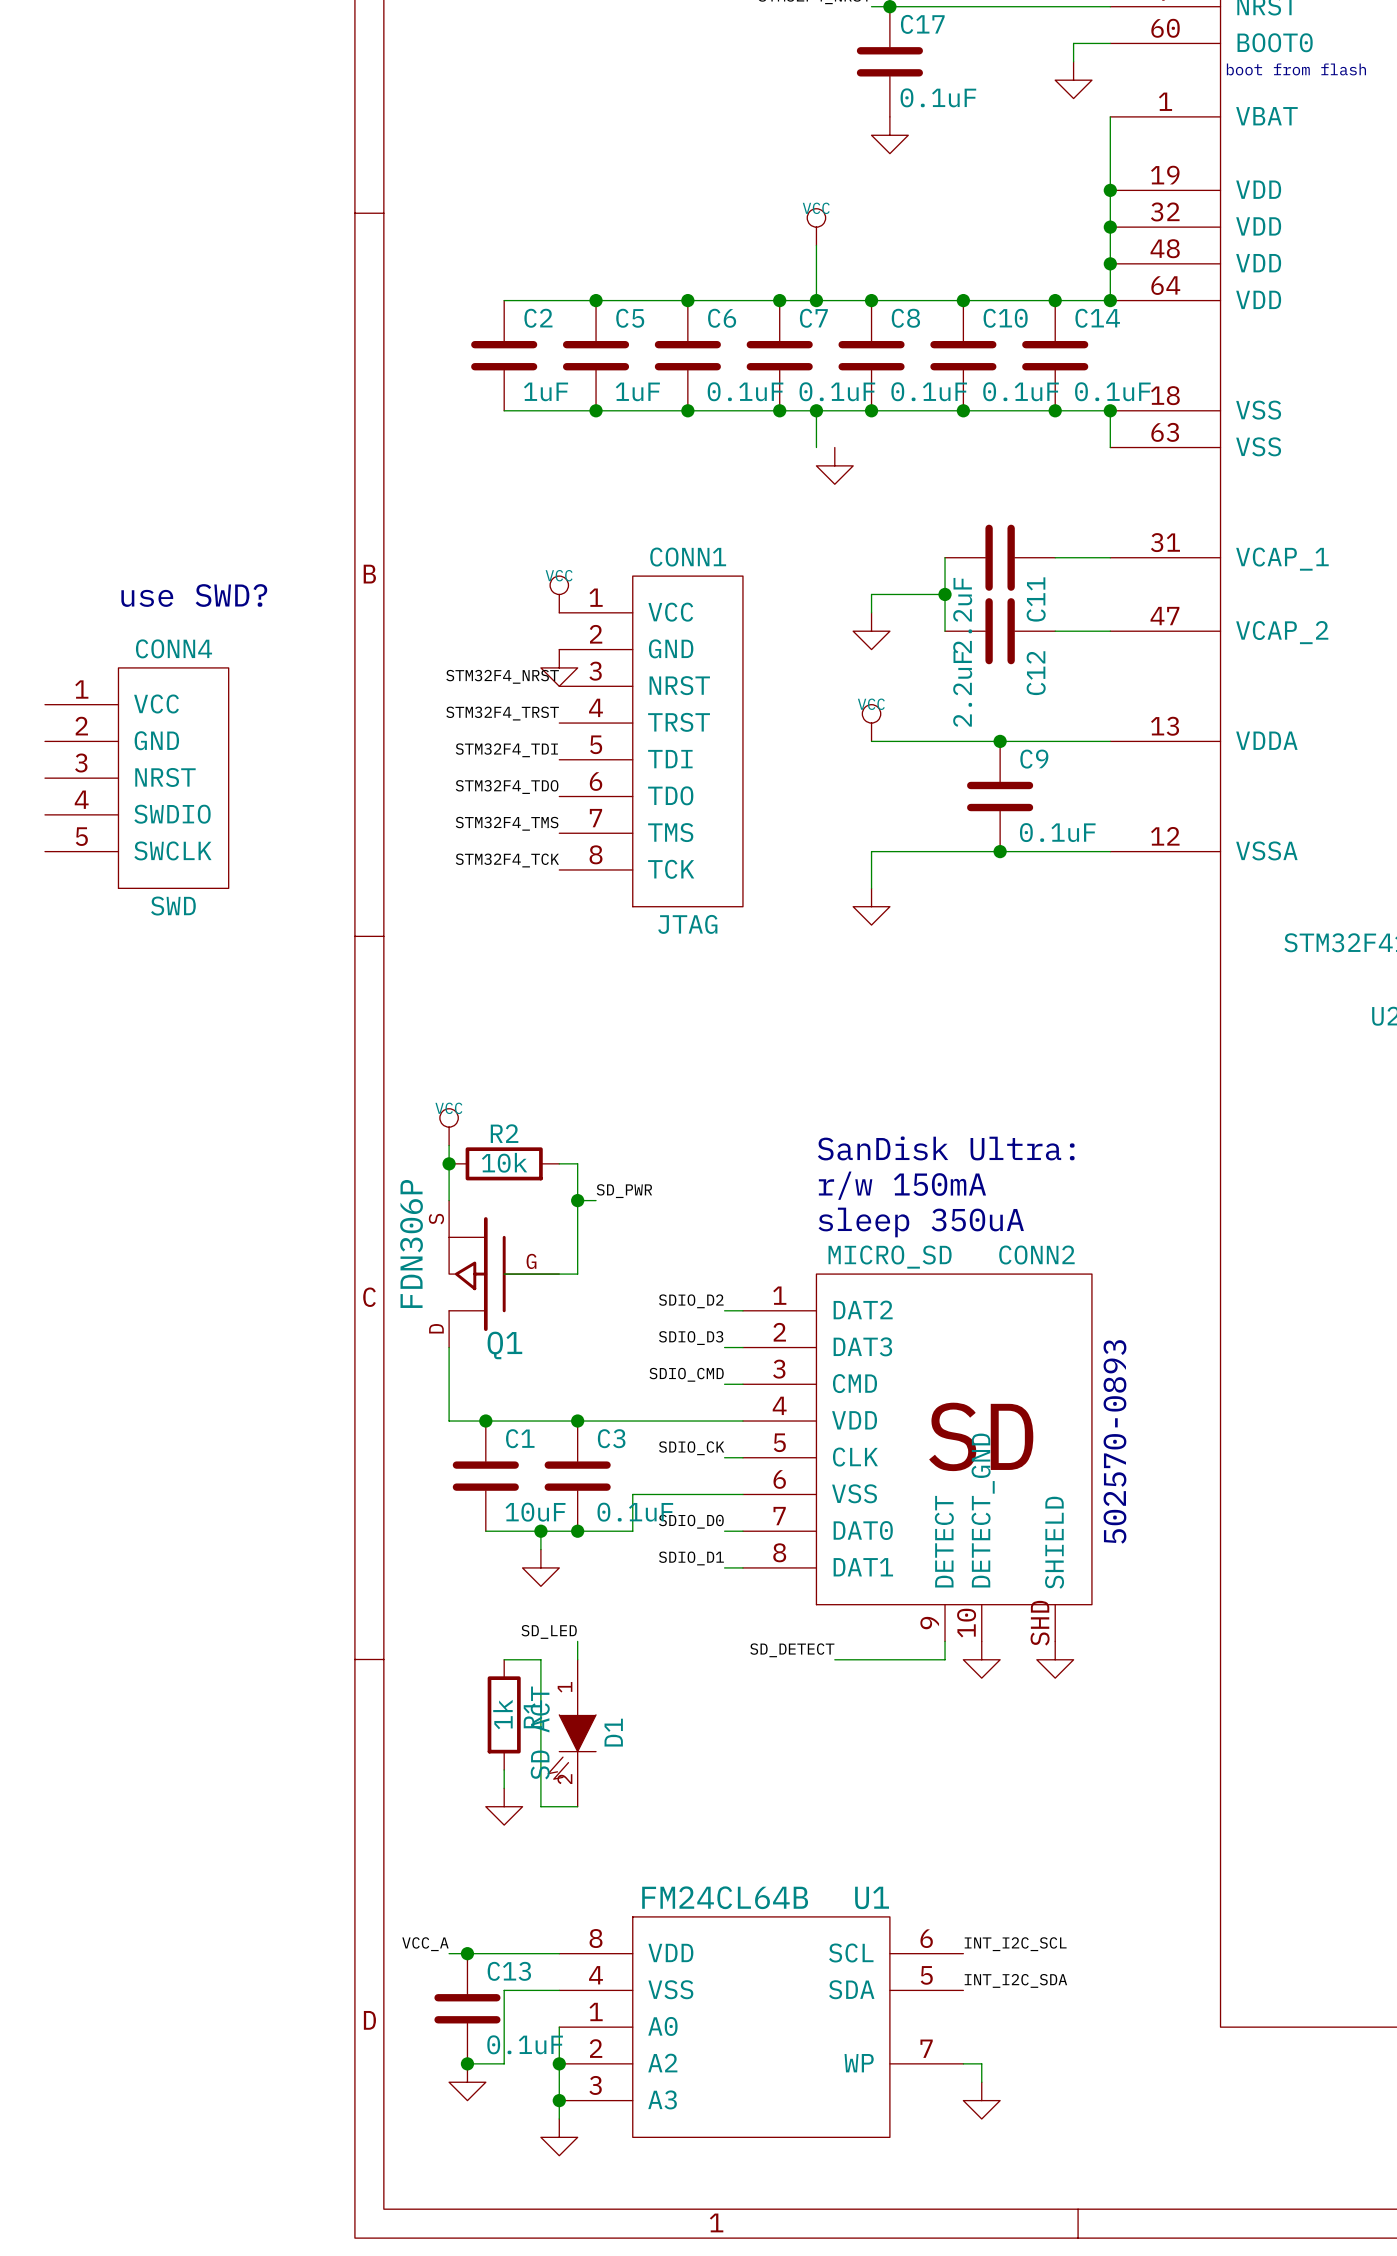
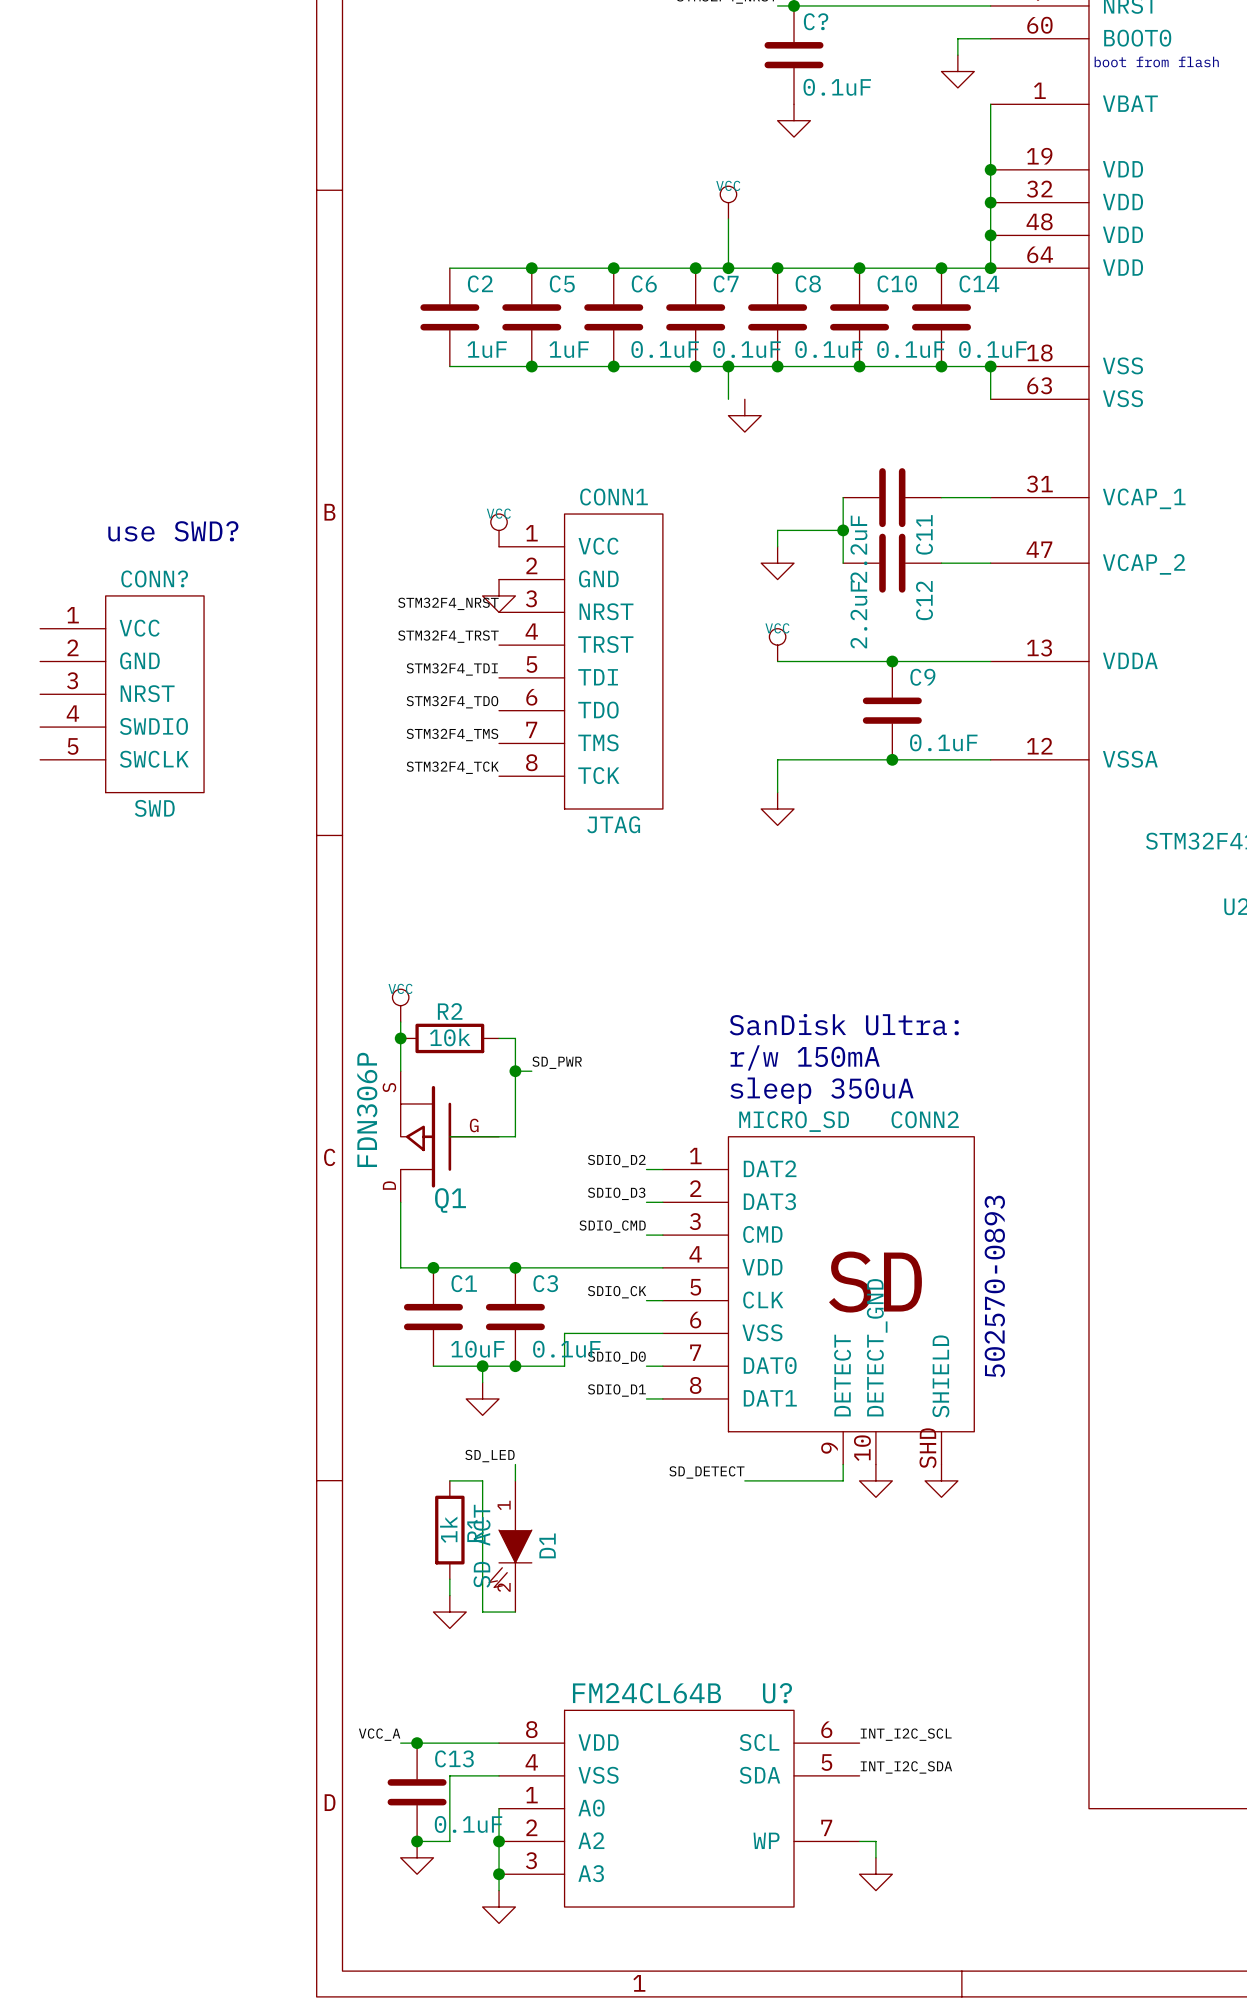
C17 name: C17 (922, 24) -> C? (816, 21)
CONN4 name: CONN4 (173, 648) -> CONN? (154, 578)
U1 name: U1 (872, 1897) -> U? (777, 1693)

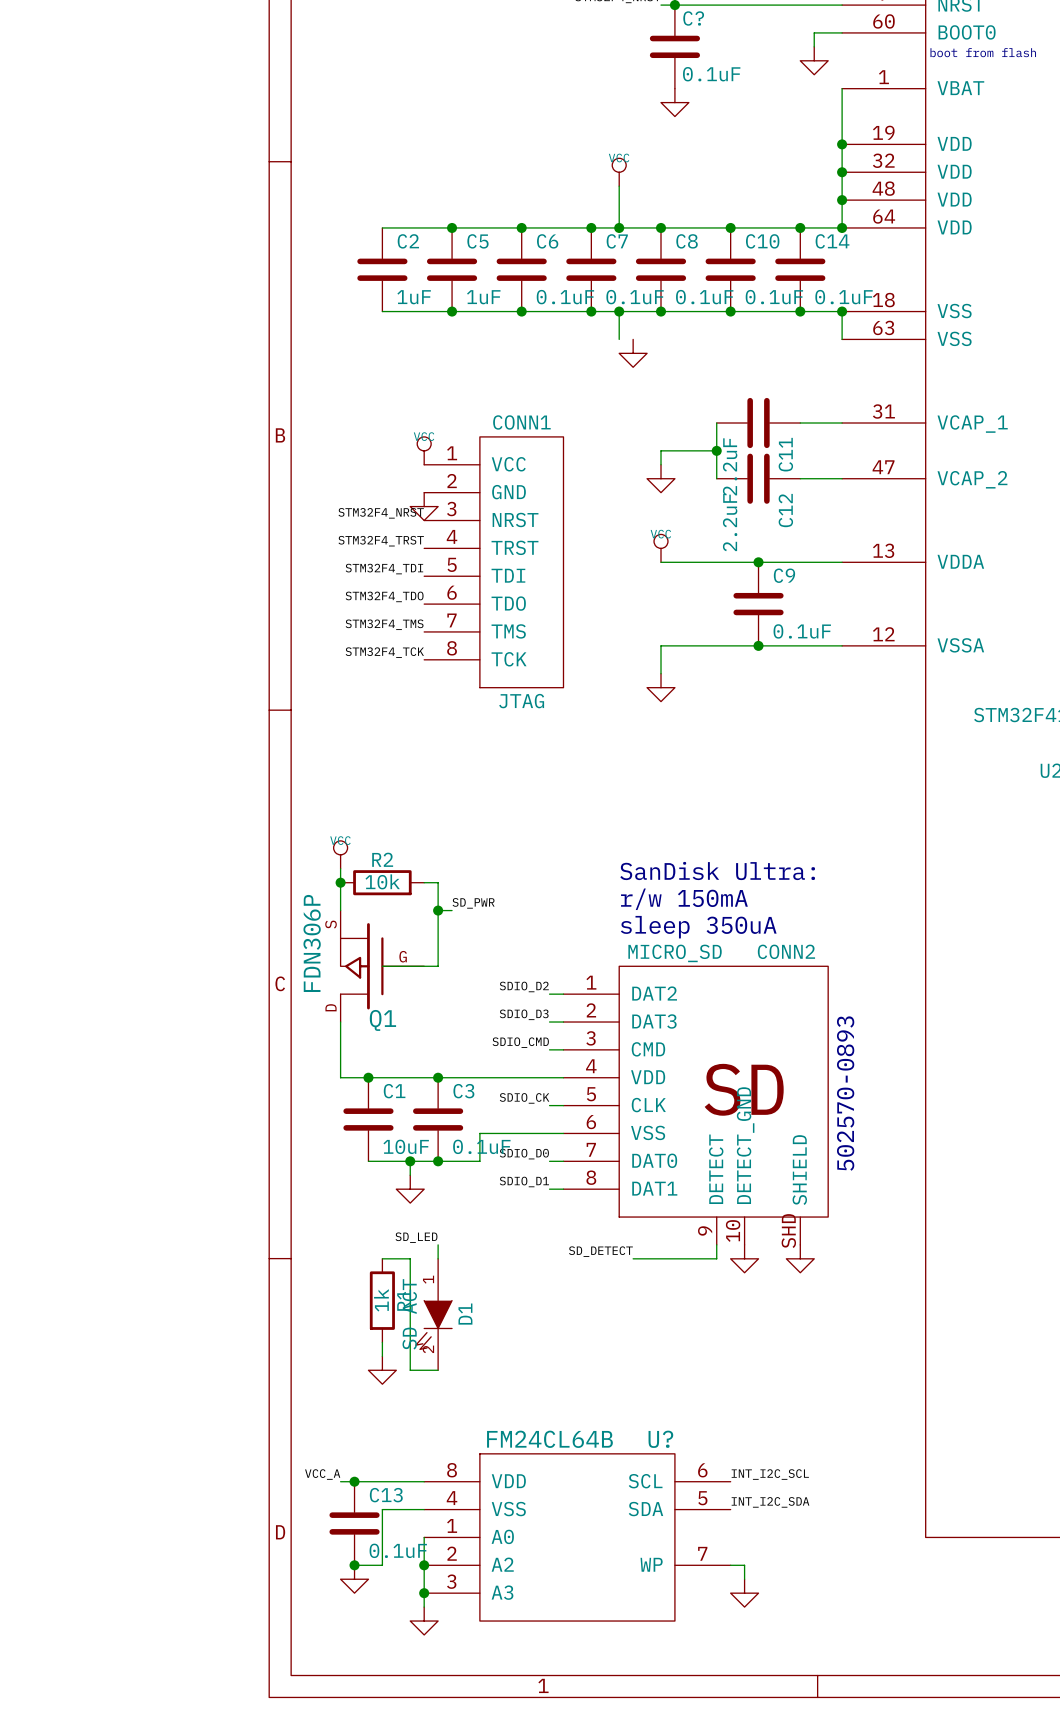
text: use SWD? (173, 531) -> none
CONN?: SWD (122, 694) -> none

